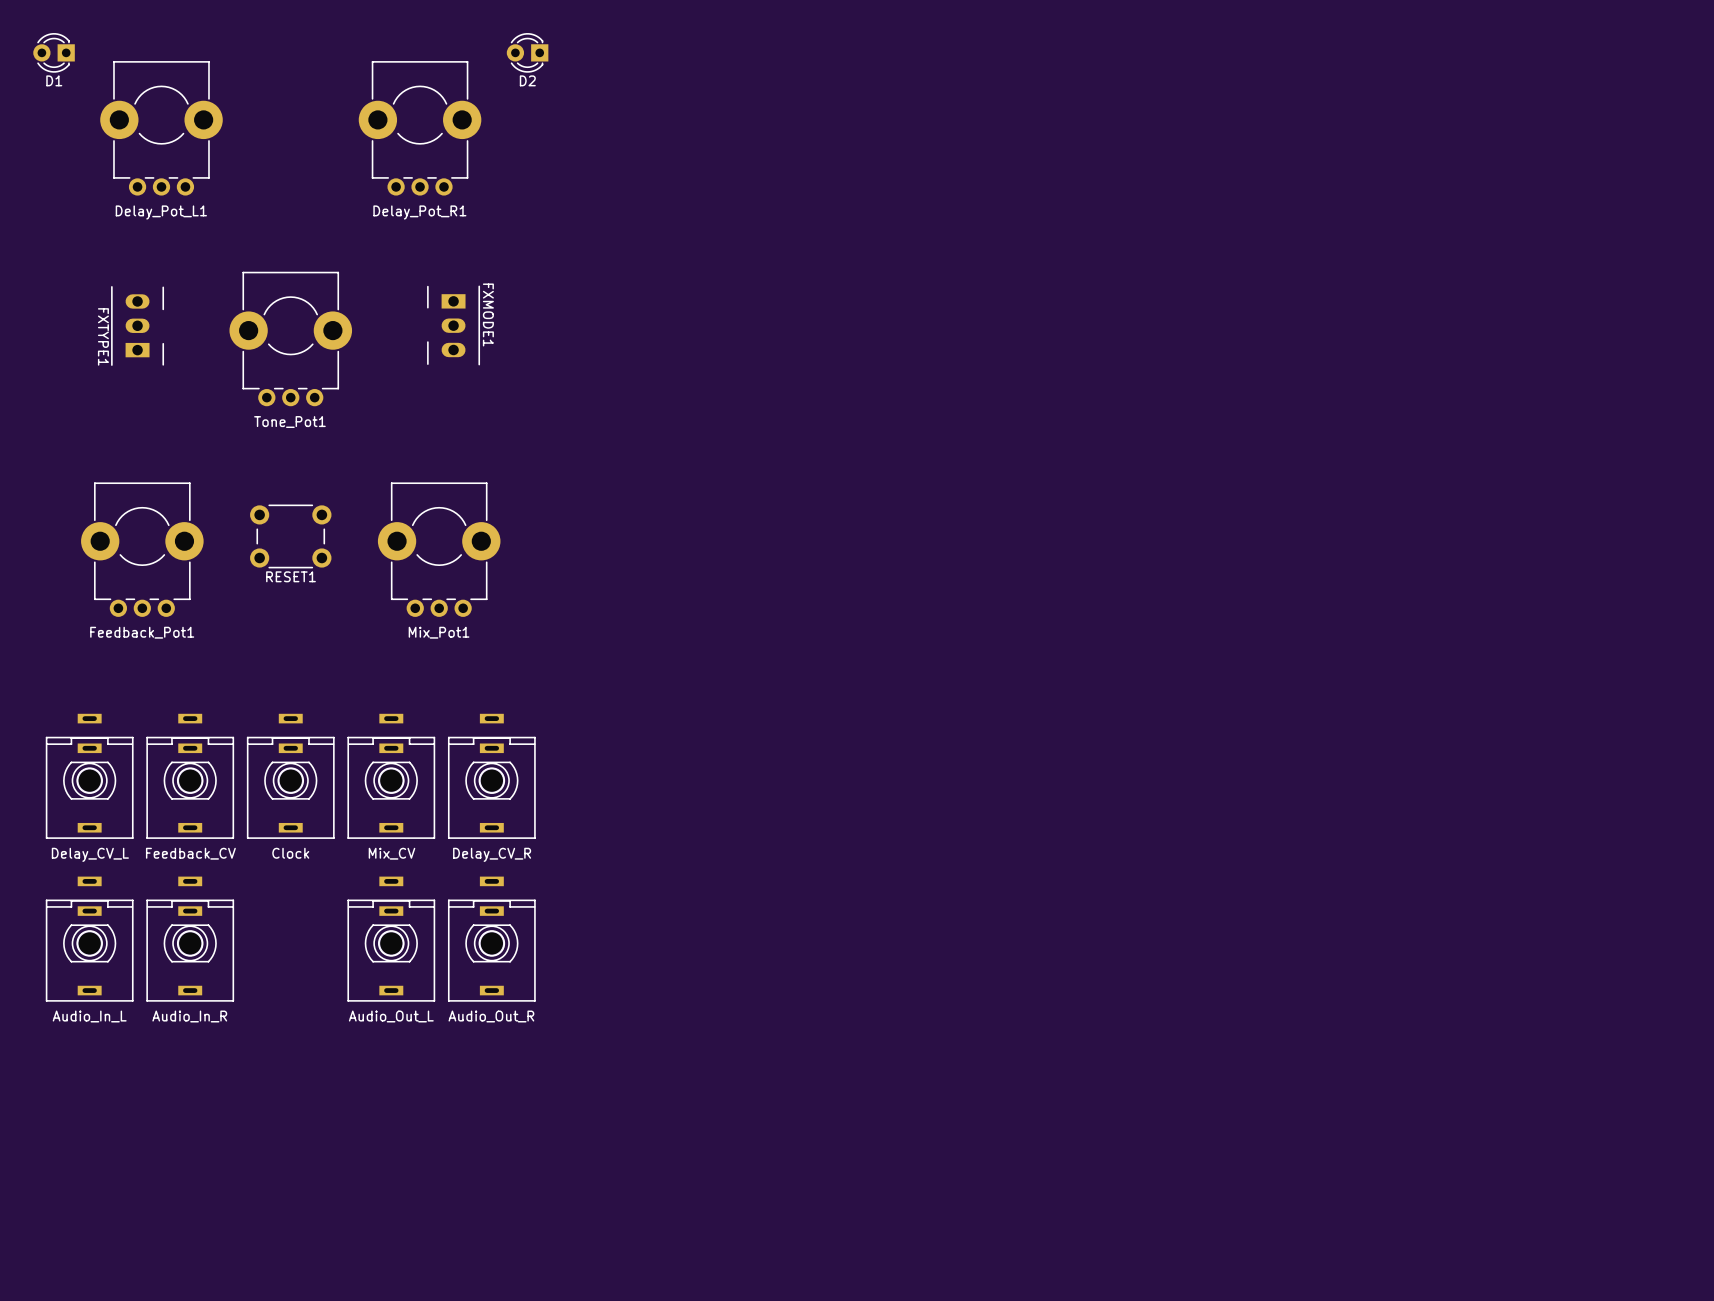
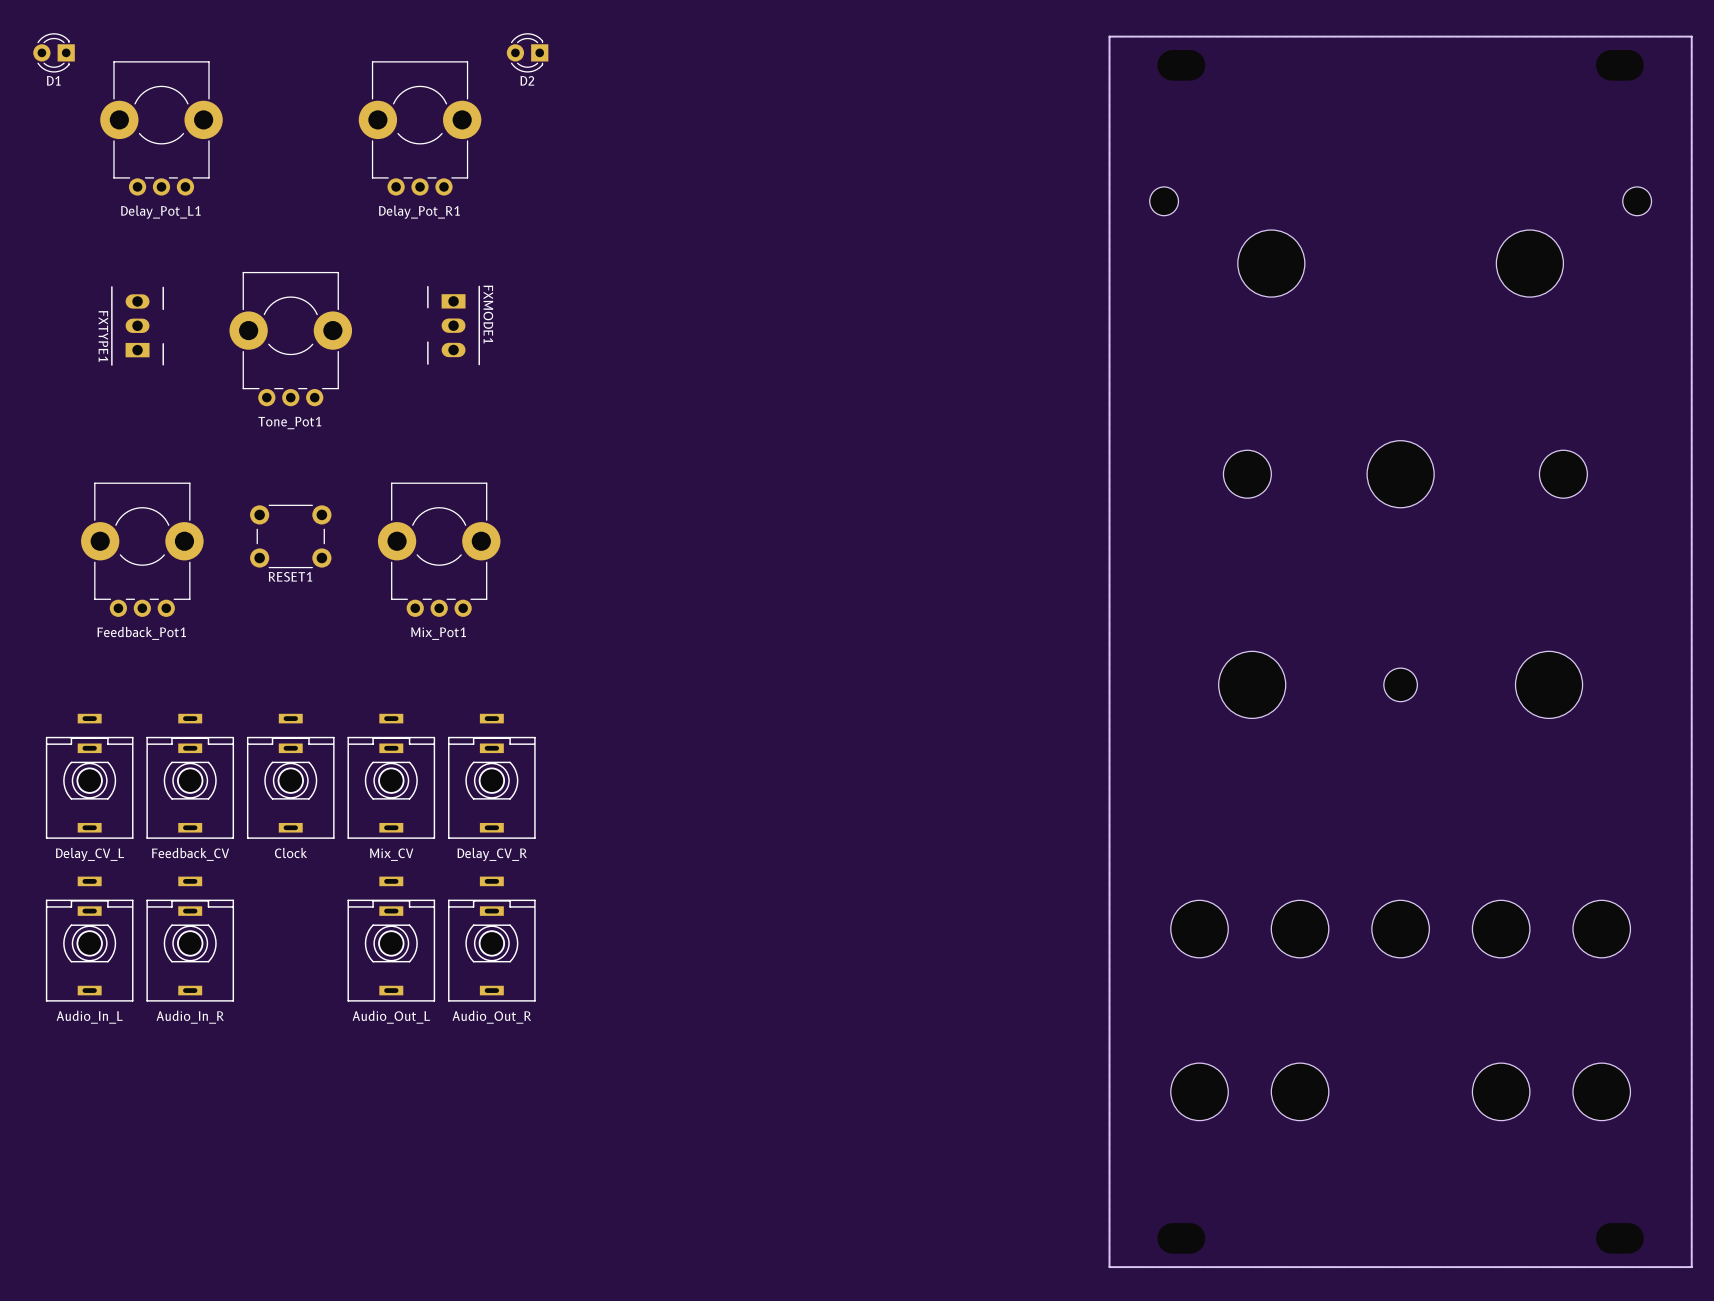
board edge: none -> (1691, 36) (1109, 36) (1109, 1267) (1691, 1267) (1691, 36)
part: none -> (1181, 65)
part: none -> (1619, 65)
part: none -> (1164, 201)
part: none -> (1637, 201)
part: none -> (1271, 263)
part: none -> (1529, 263)
part: none -> (1247, 474)
part: none -> (1400, 474)
part: none -> (1563, 474)
part: none -> (1252, 684)
part: none -> (1400, 684)
part: none -> (1549, 684)
part: none -> (1199, 929)
part: none -> (1300, 929)
part: none -> (1400, 929)
part: none -> (1501, 929)
part: none -> (1601, 929)
part: none -> (1199, 1091)
part: none -> (1300, 1091)
part: none -> (1501, 1091)
part: none -> (1601, 1091)
part: none -> (1181, 1238)
part: none -> (1619, 1238)

